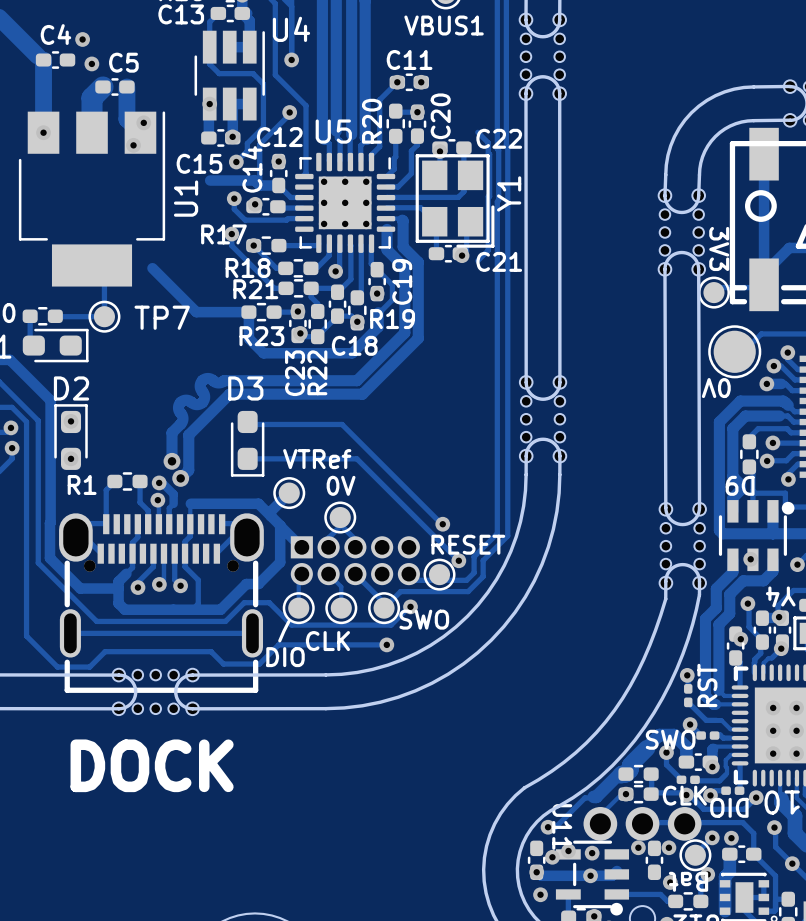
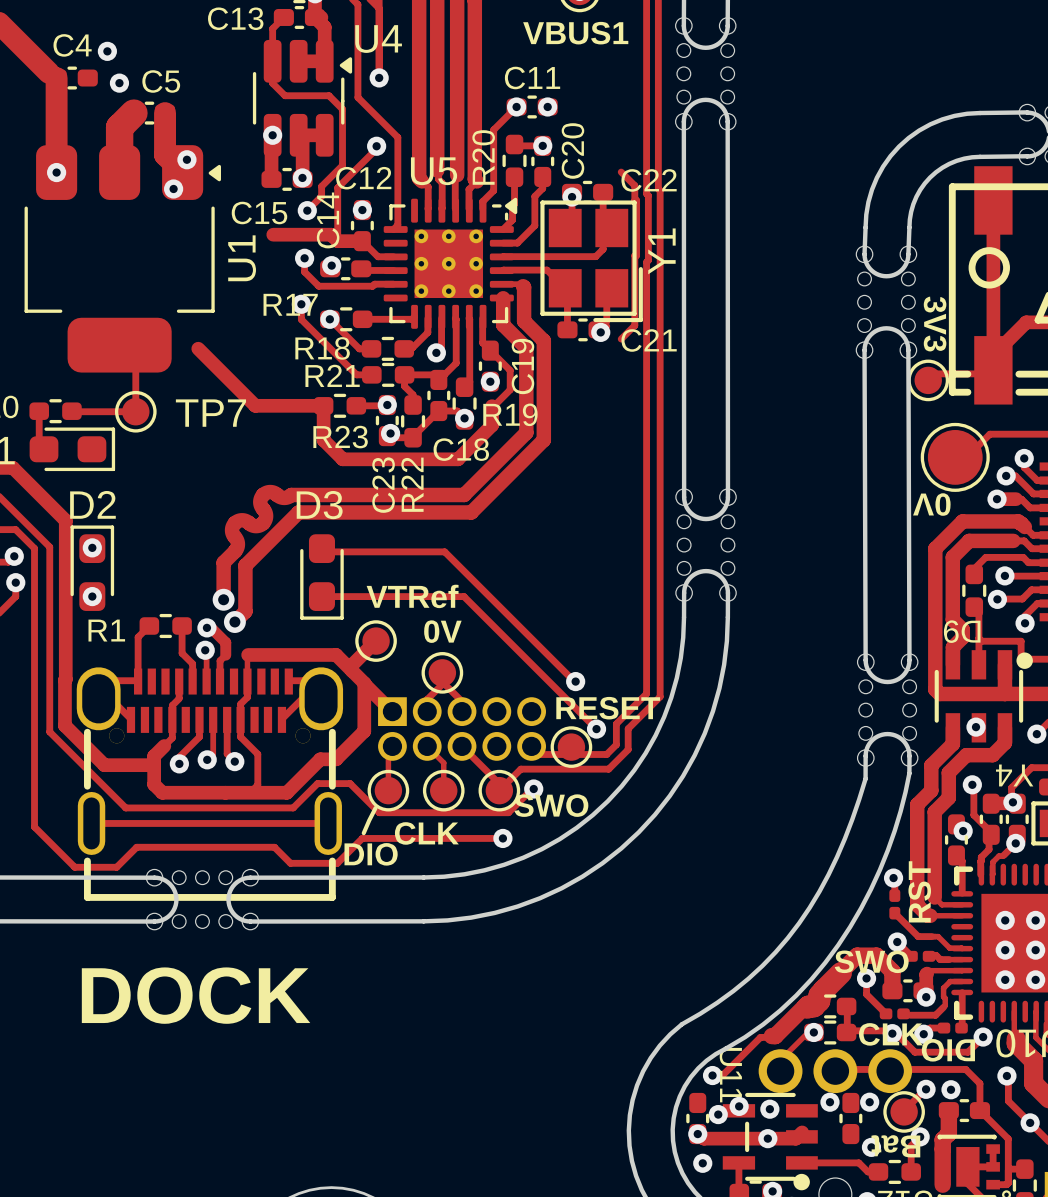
U4 footprint: [194, 30, 265, 121] -> [252, 39, 353, 157]
U1 footprint: [18, 111, 166, 287] -> [24, 145, 222, 373]
U5 footprint: [295, 152, 396, 253] -> [383, 197, 518, 329]

